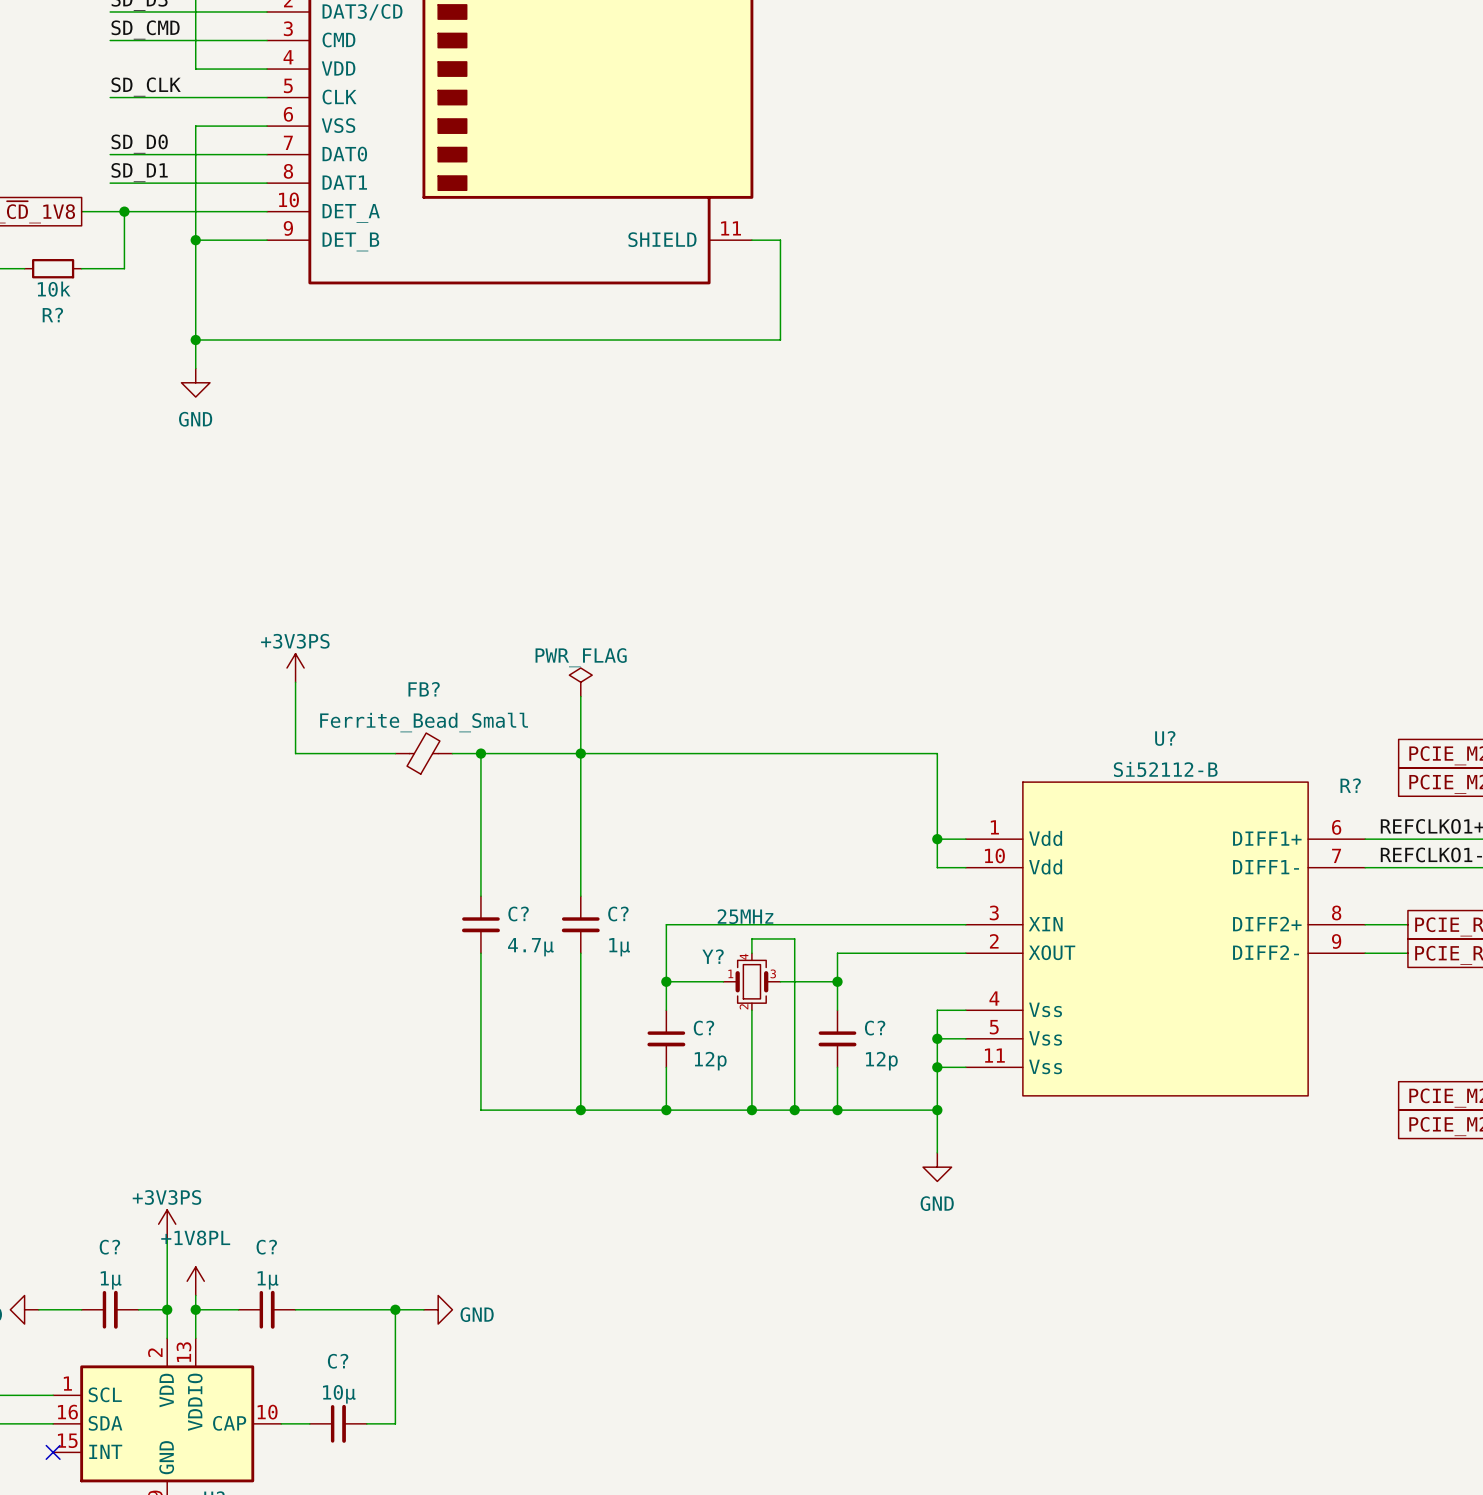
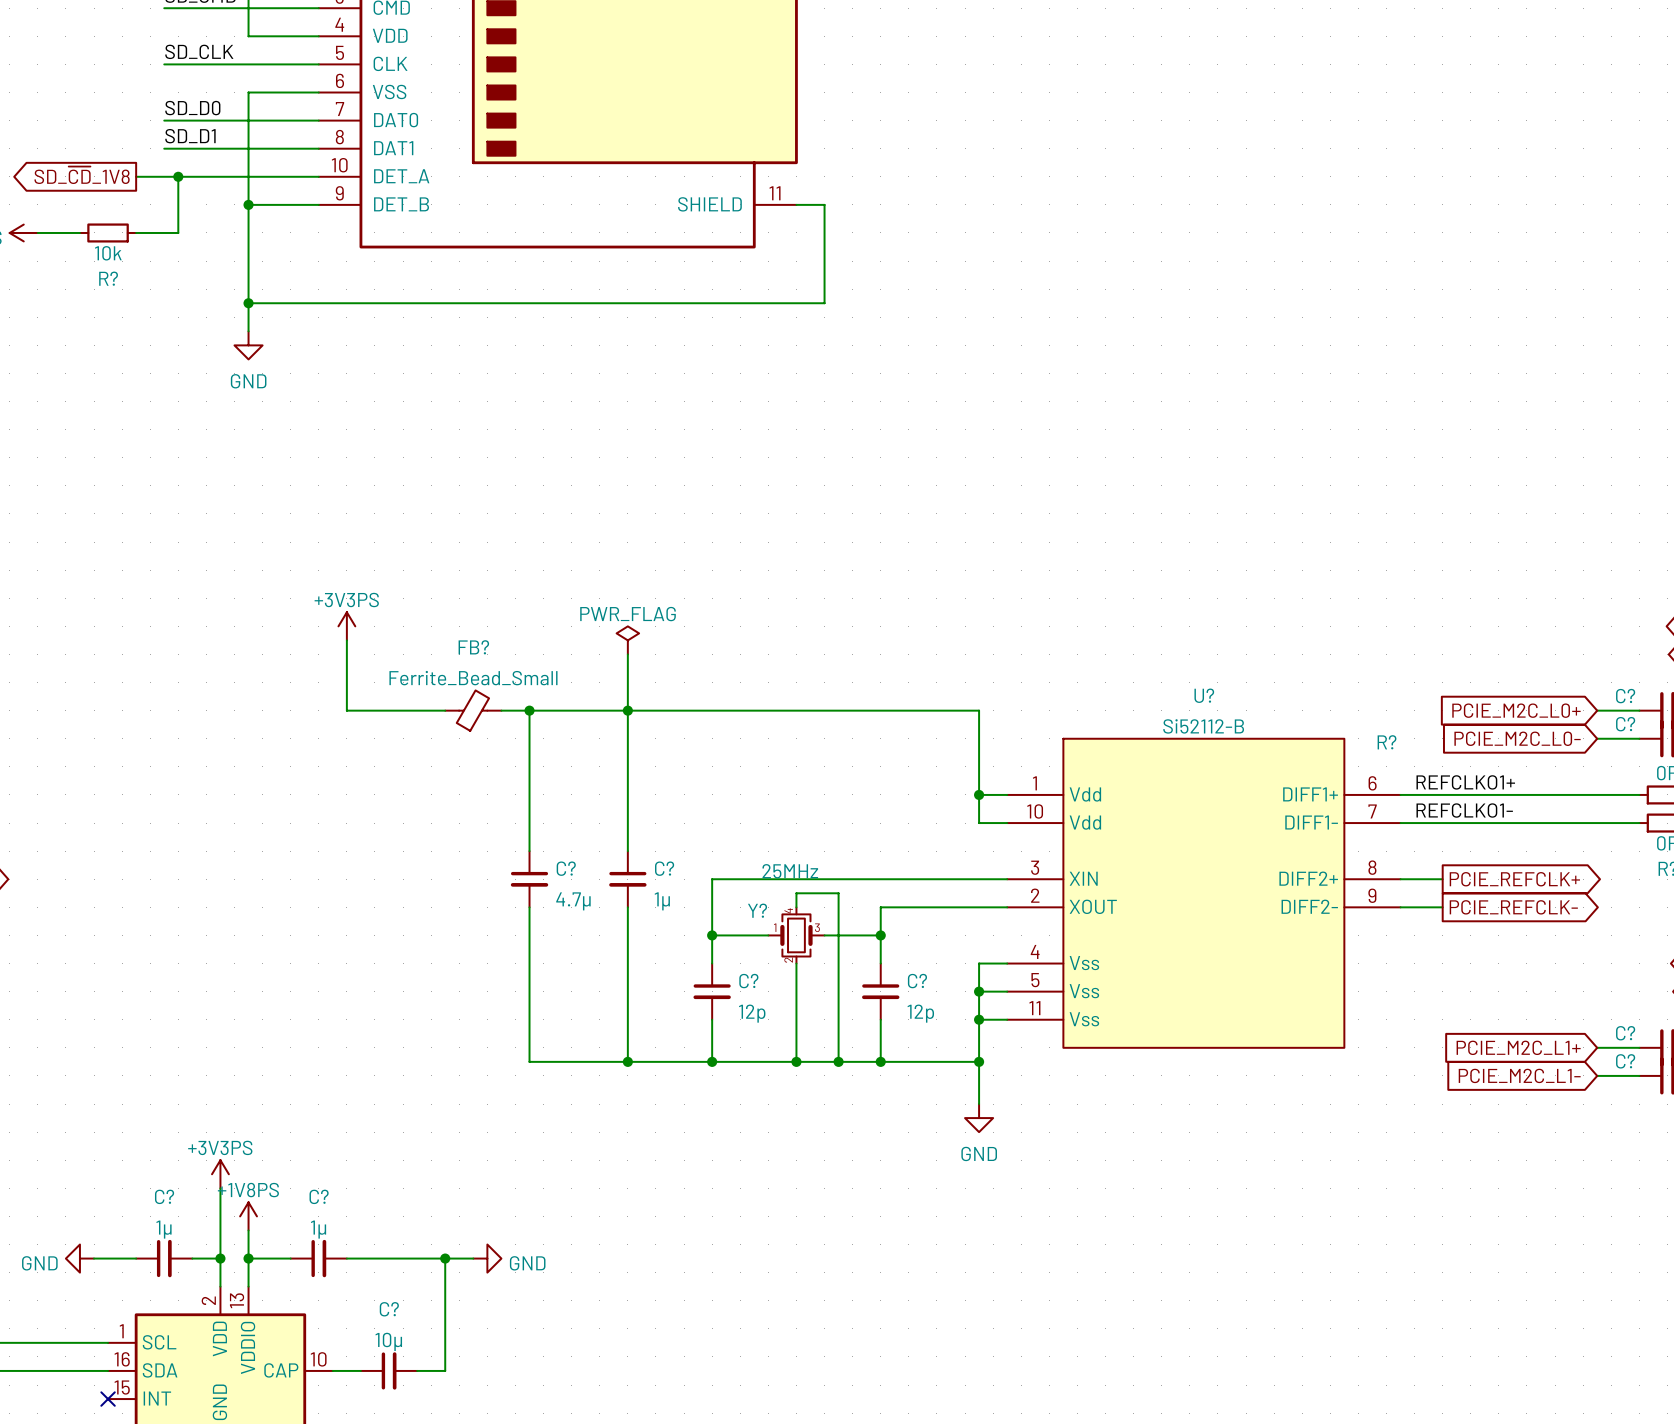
power symbol: none -> +1V8PS (248, 1216)
power symbol: +1V8PL (195, 1281) -> none

